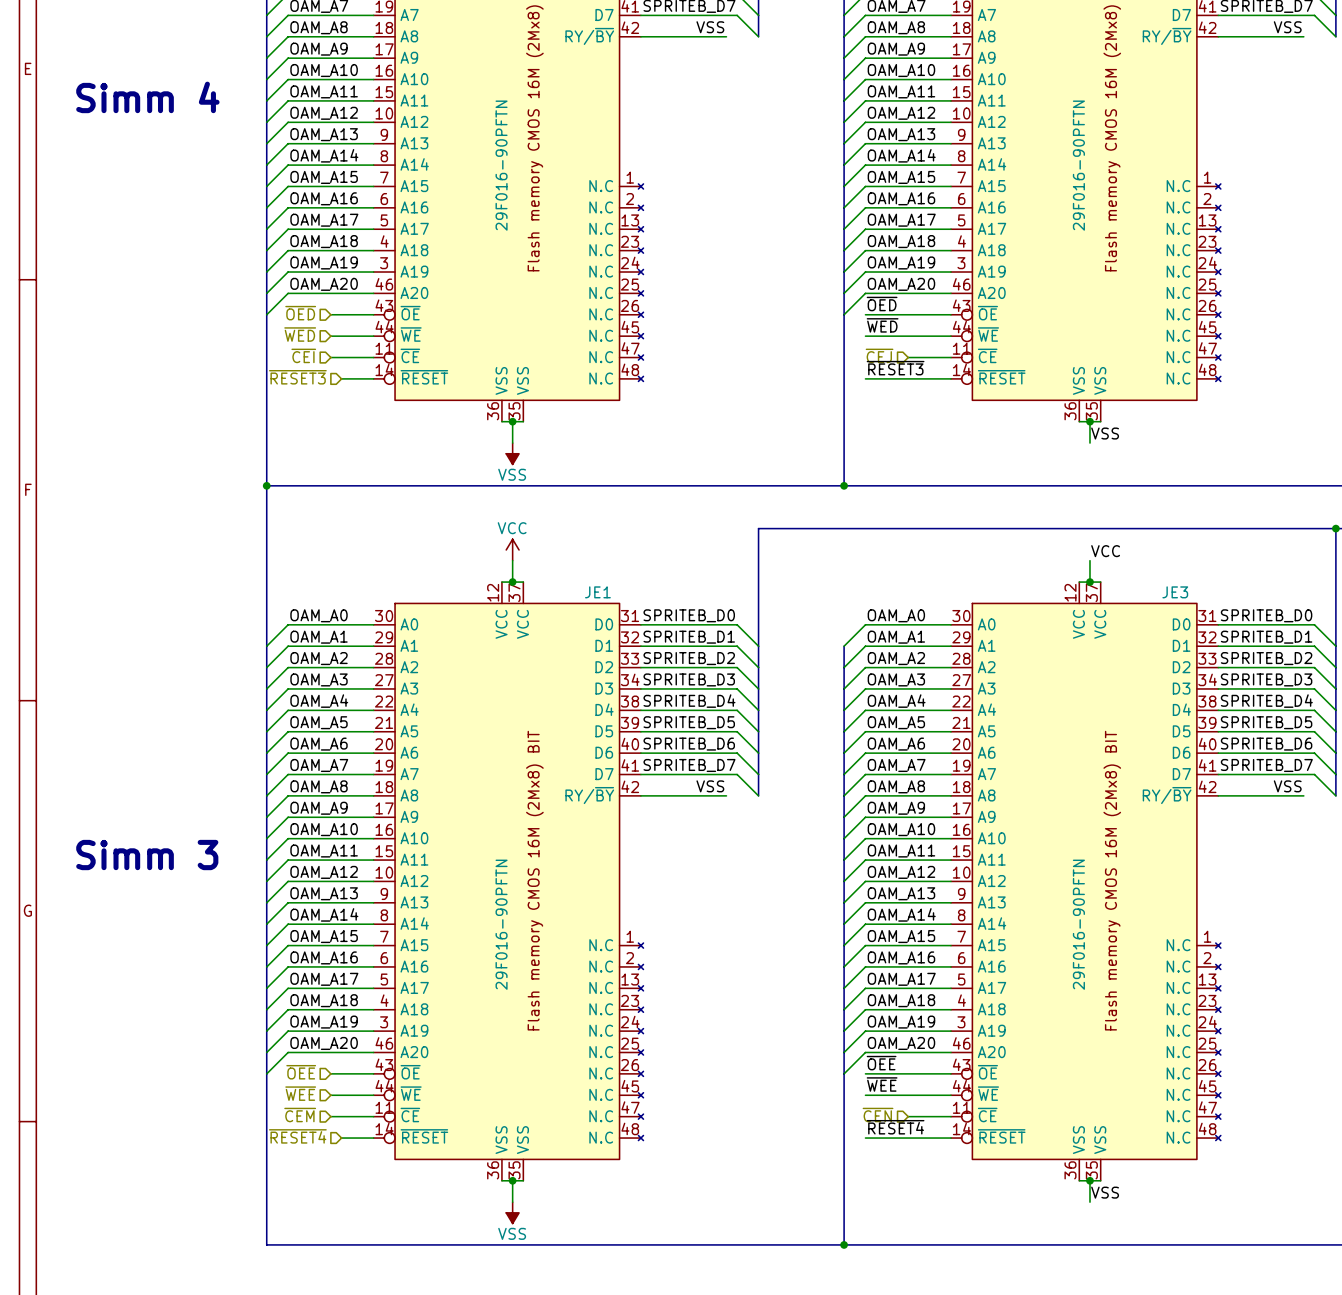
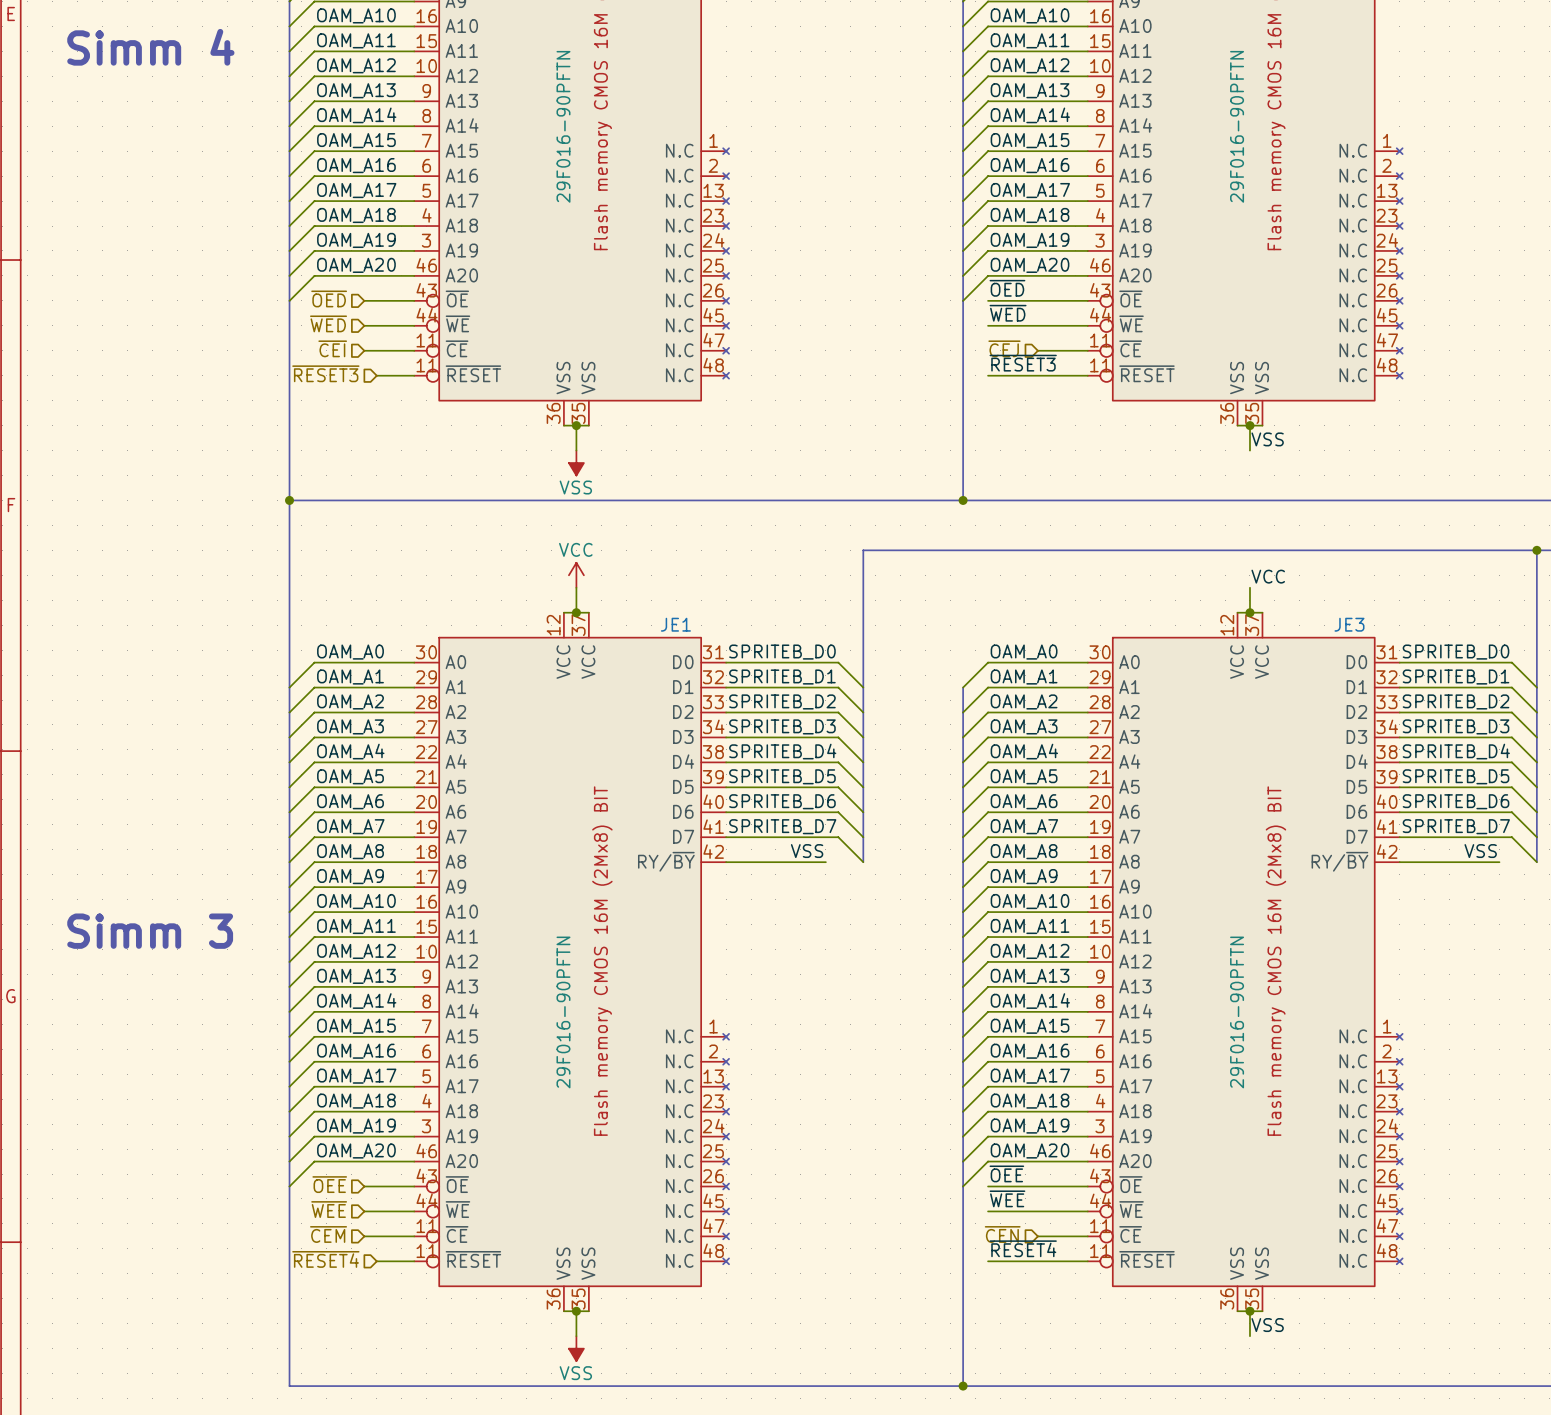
part pin number: 14 (384, 369) -> 11 (426, 365)
part pin number: 14 (961, 369) -> 11 (1100, 365)
JE1 pin number: 14 (384, 1128) -> 11 (426, 1251)
JE3 pin number: 14 (961, 1128) -> 11 (1100, 1251)

